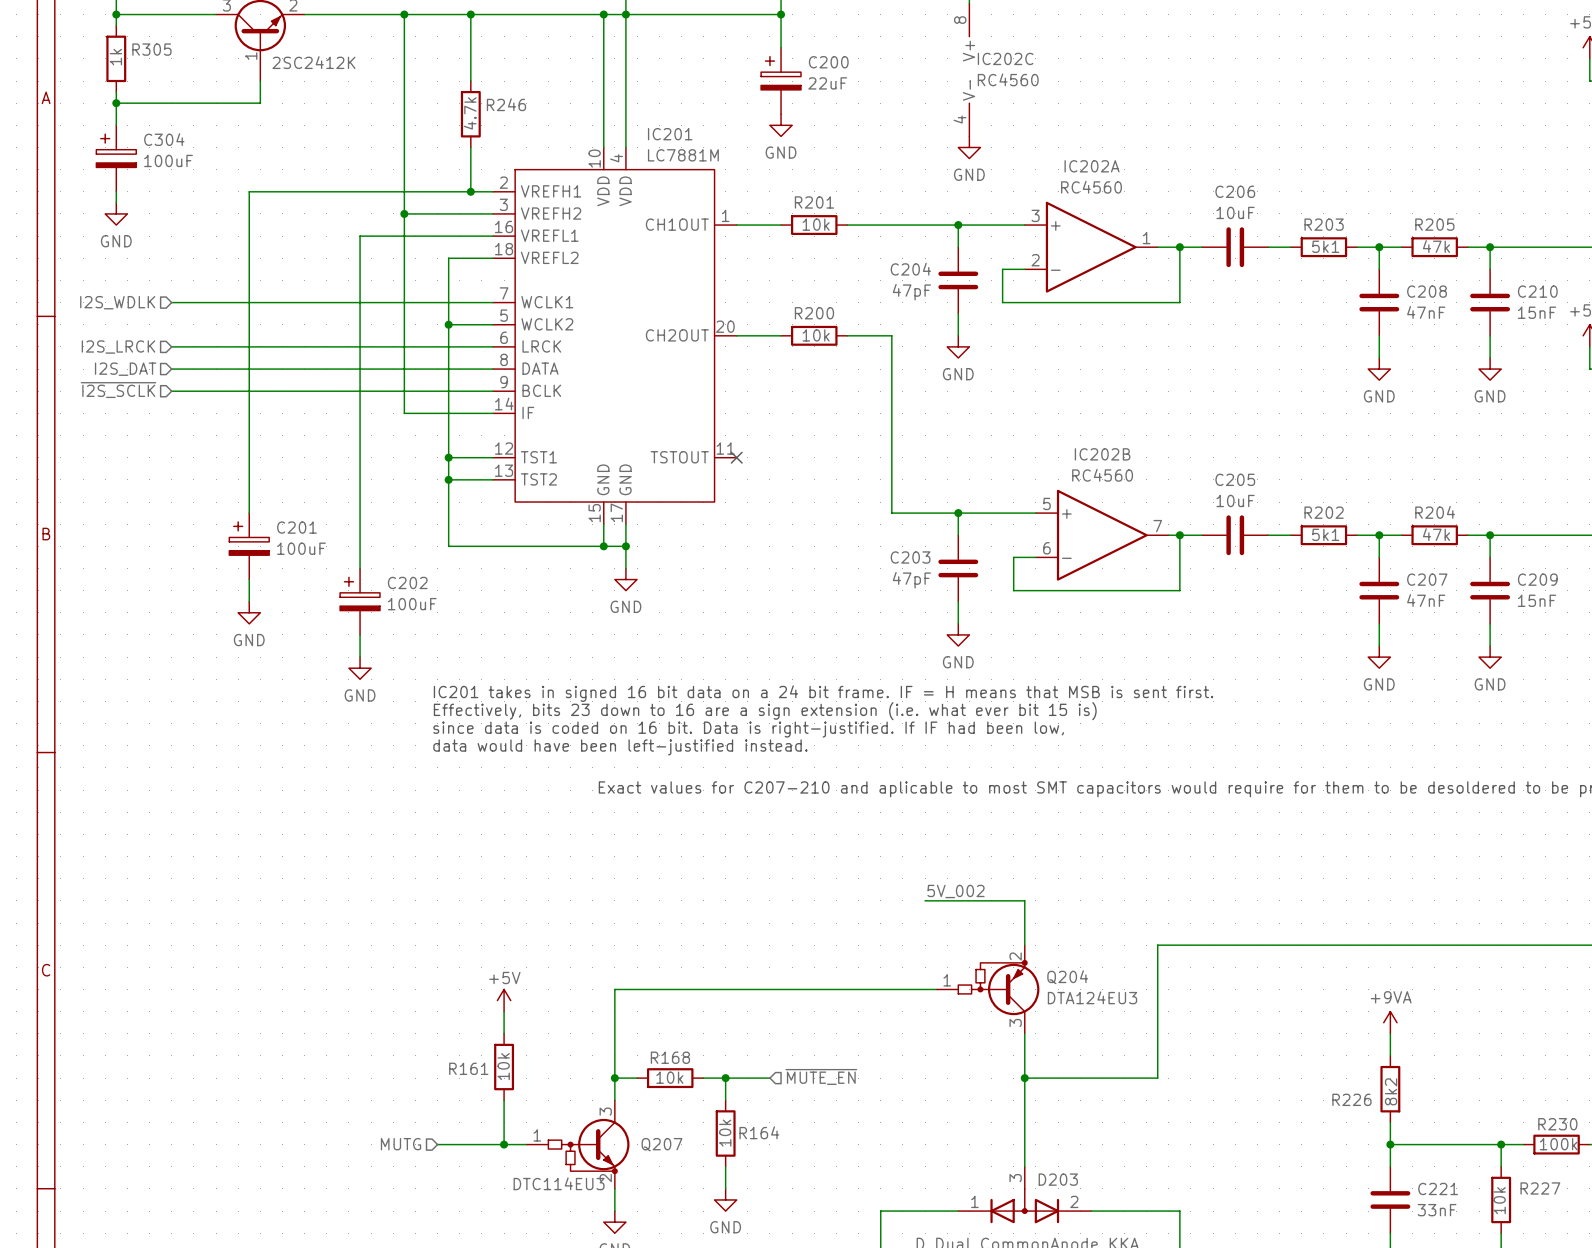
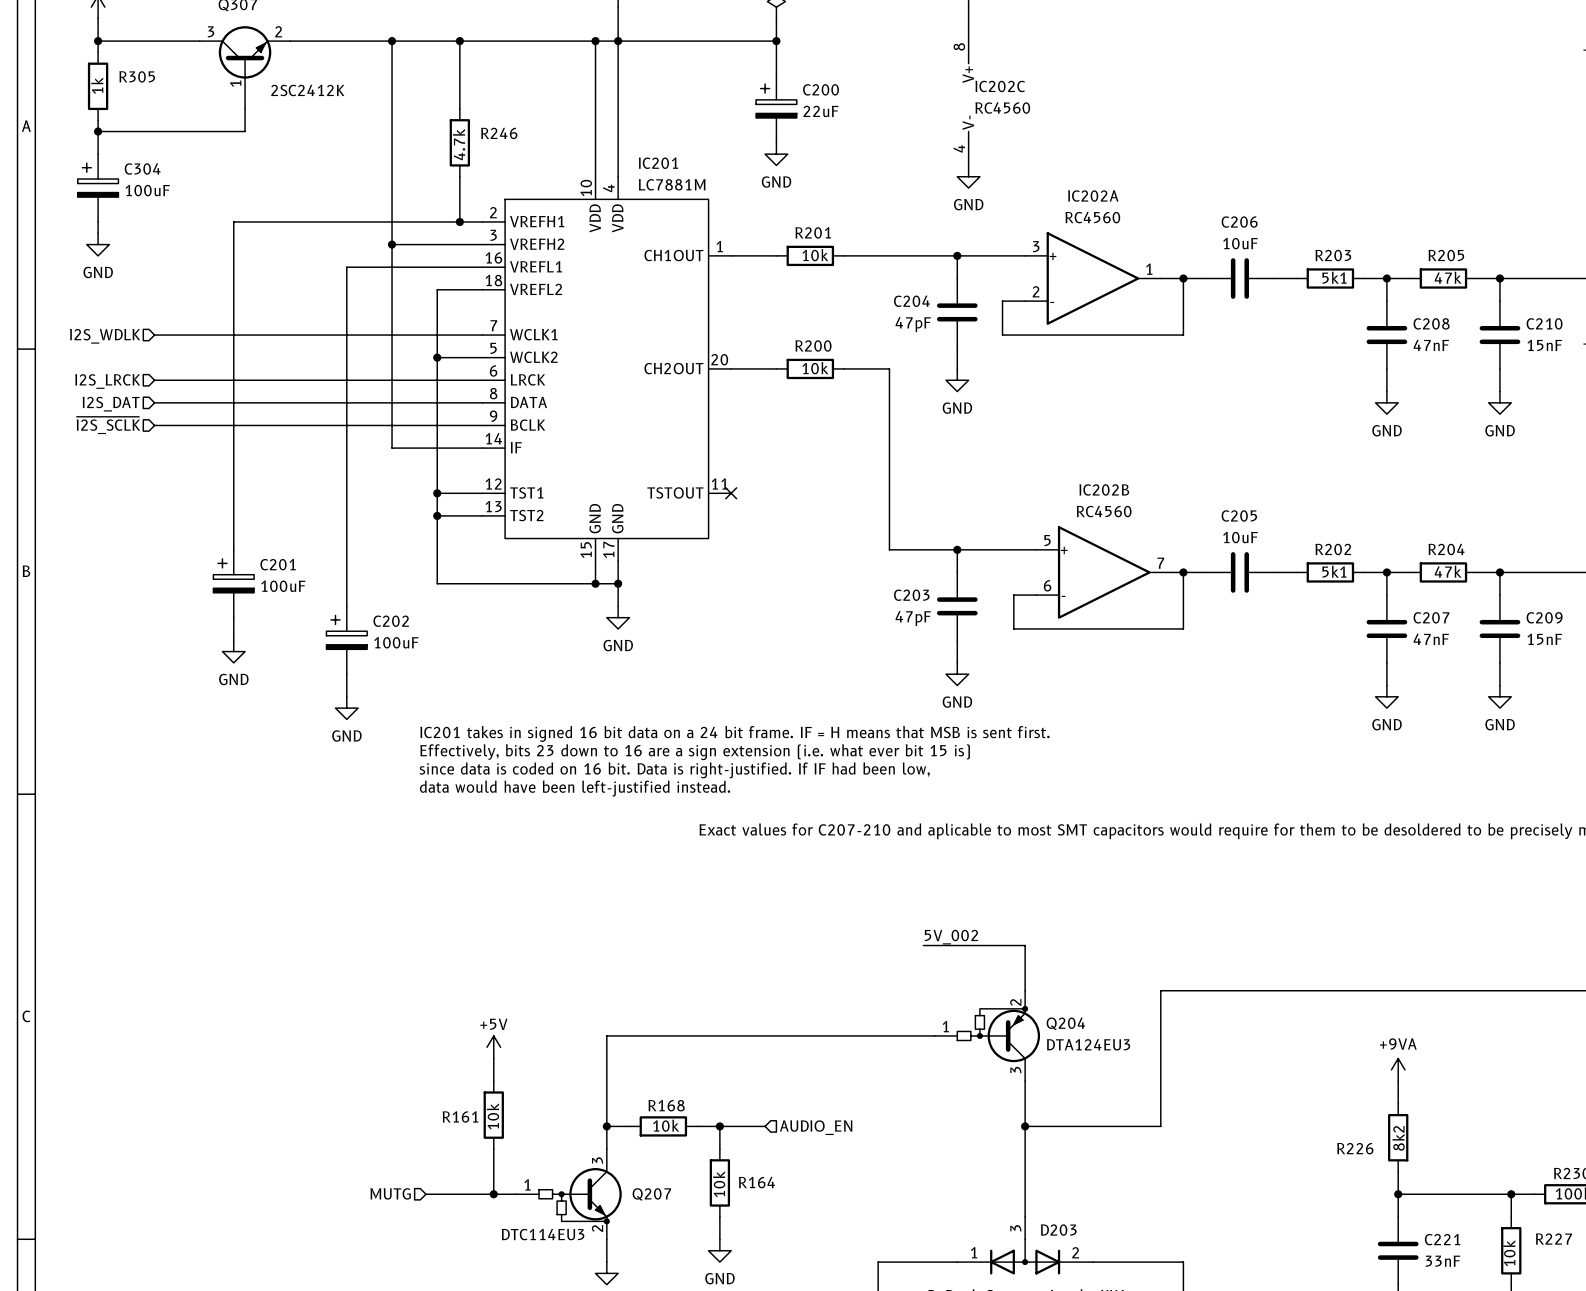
hierarchical label: ~{MUTE_EN} (821, 1076) -> AUDIO_EN (816, 1127)

